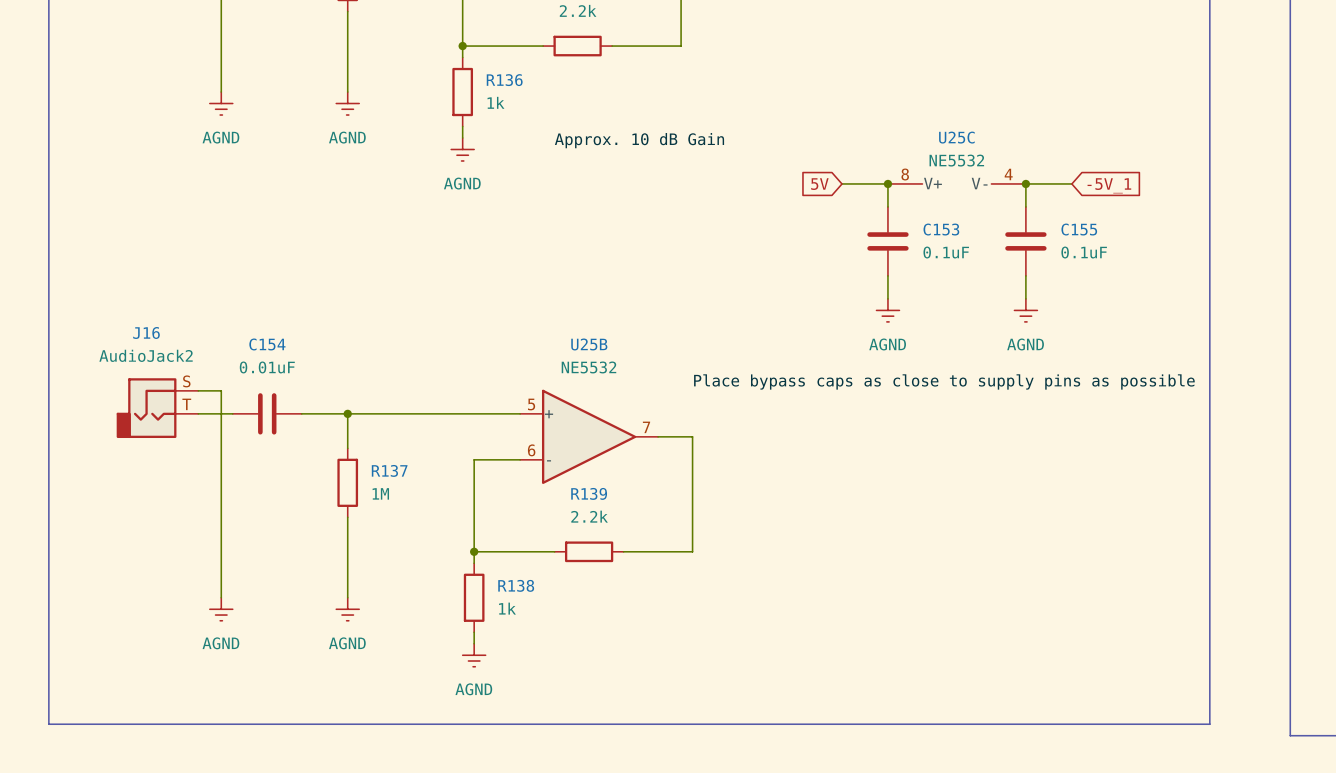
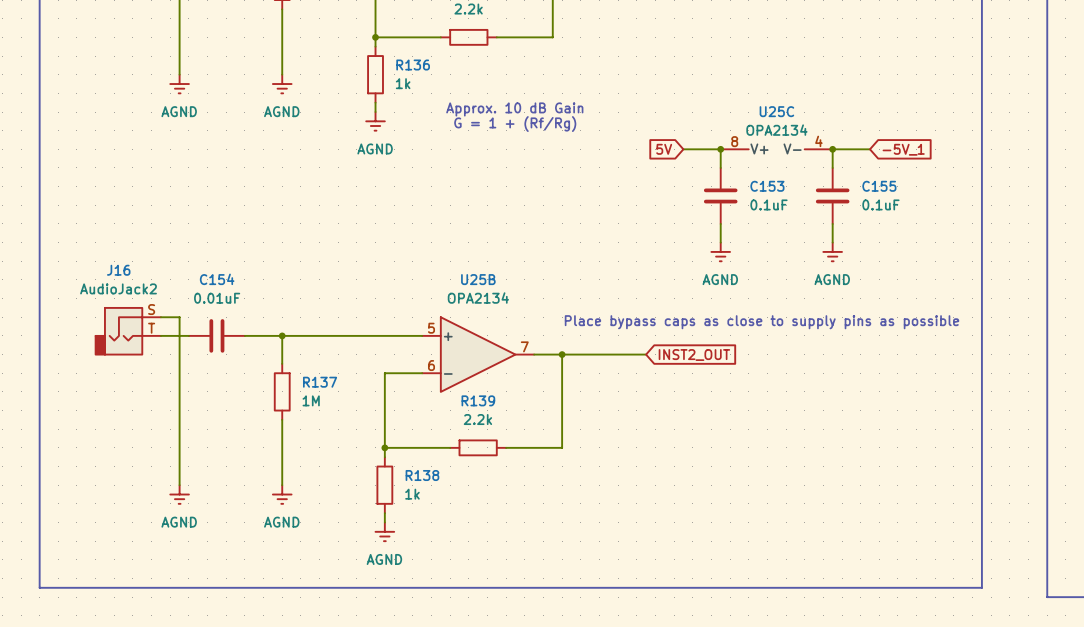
text: none -> Approx. 10 dB Gain (514, 109)
label: Approx. 10 dB Gain (639, 140) -> none
text: none -> G = 1 + (Rf/Rg) (515, 124)
U25C value: NE5532 (956, 160) -> OPA2134 (776, 130)
U25B value: NE5532 (588, 367) -> OPA2134 (478, 298)
label: Place bypass caps as close to supply pins as possible (944, 381) -> none
text: none -> Place bypass caps as close to supply pins as possible (761, 322)
wire: none -> (562, 354) (646, 354)
junction: none -> (562, 354)
global label: none -> INST2_OUT (694, 355)

